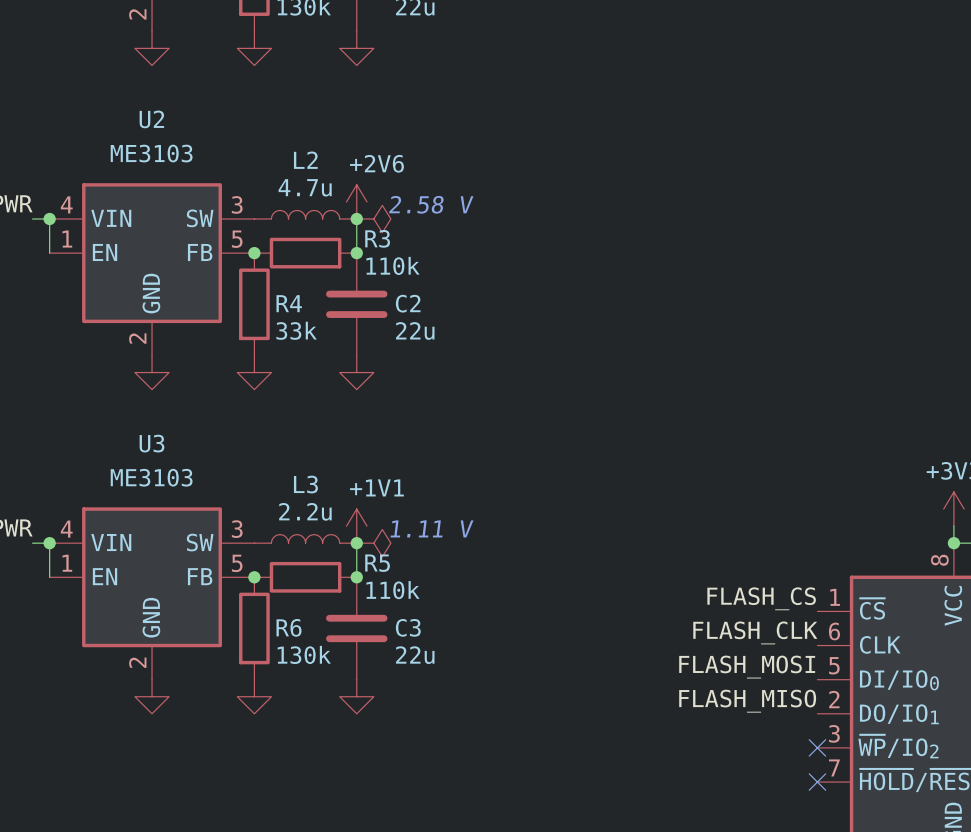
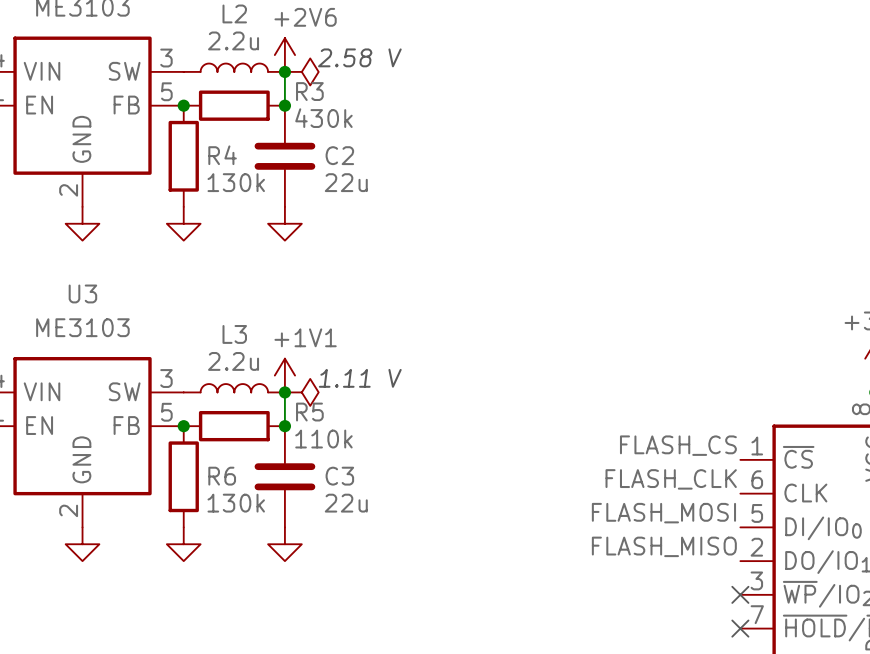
L2 value: 4.7u (305, 187) -> 2.2u (233, 40)
R3 value: 110k (392, 265) -> 430k (323, 118)
R4 value: 33k (296, 330) -> 130k (236, 182)

